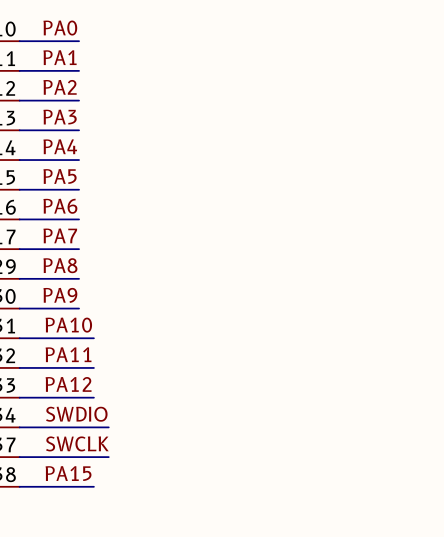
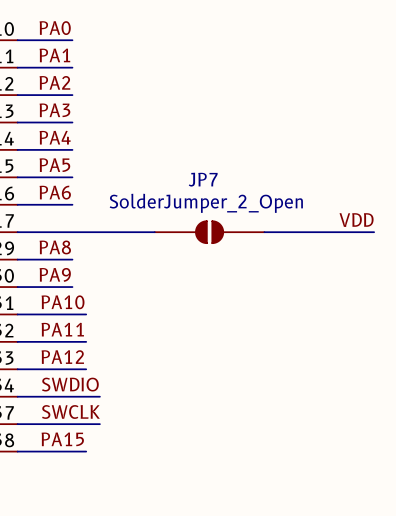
label: PA7 (60, 235) -> none
label: none -> VDD (356, 220)
wire: none -> (72, 232) (154, 232)
JP7: none -> SolderJumper_2_Open (209, 232)
wire: none -> (264, 232) (374, 232)

